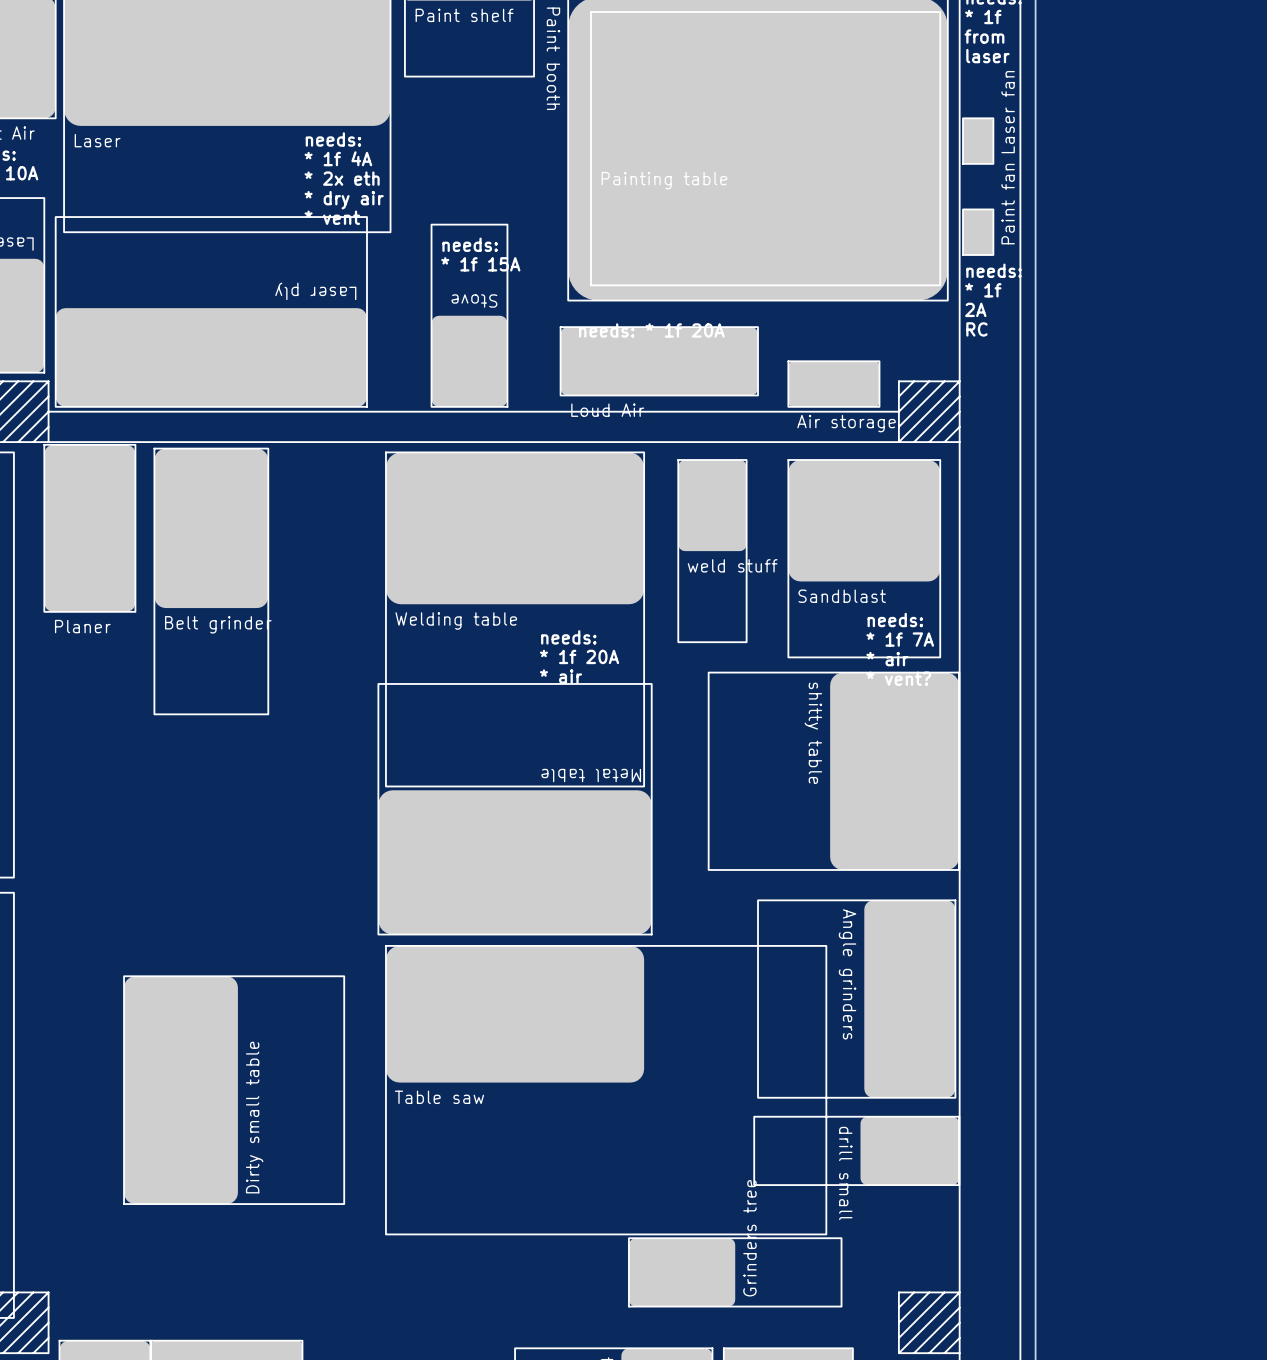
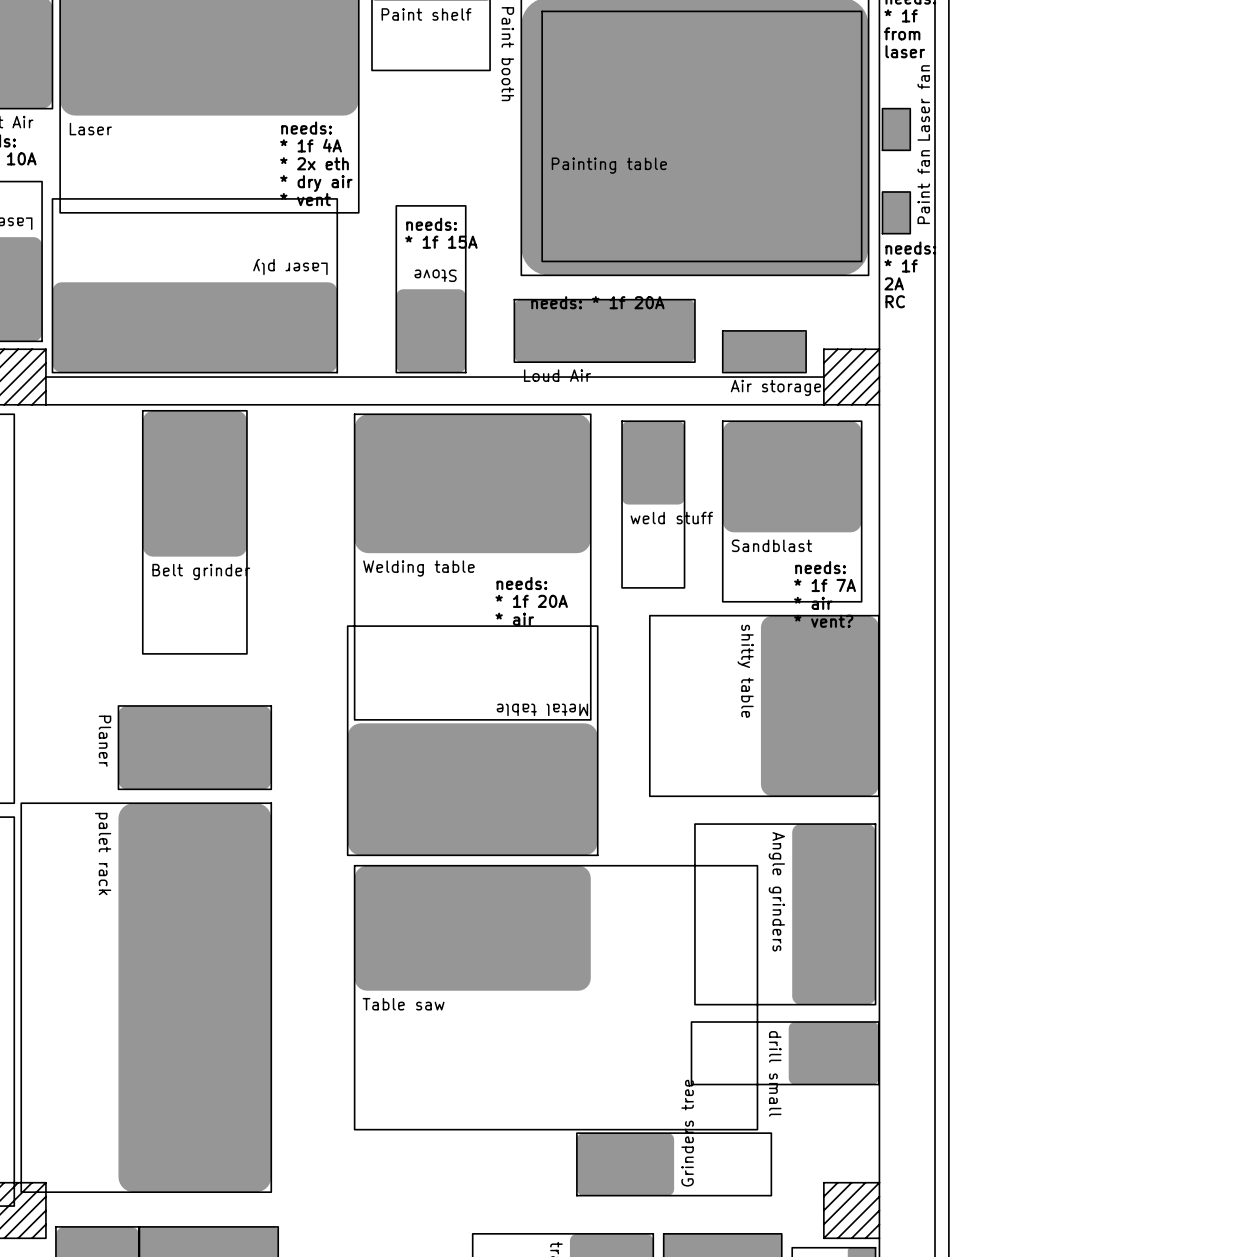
part rotation: 0° (89, 528) -> 90° clockwise (194, 747)
part position: (89, 528) -> (194, 747)
part: none -> palet rack (146, 997)
part: Dirty small table (234, 1090) -> none

